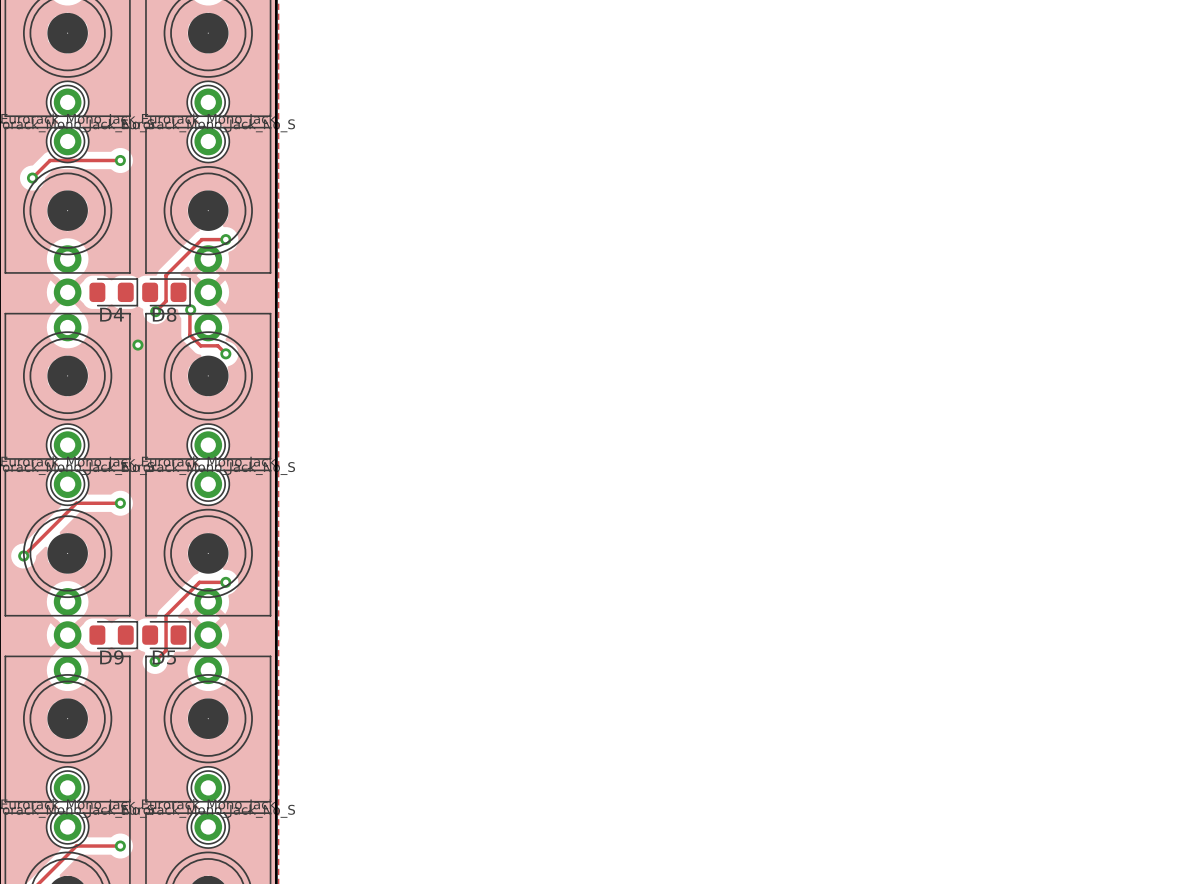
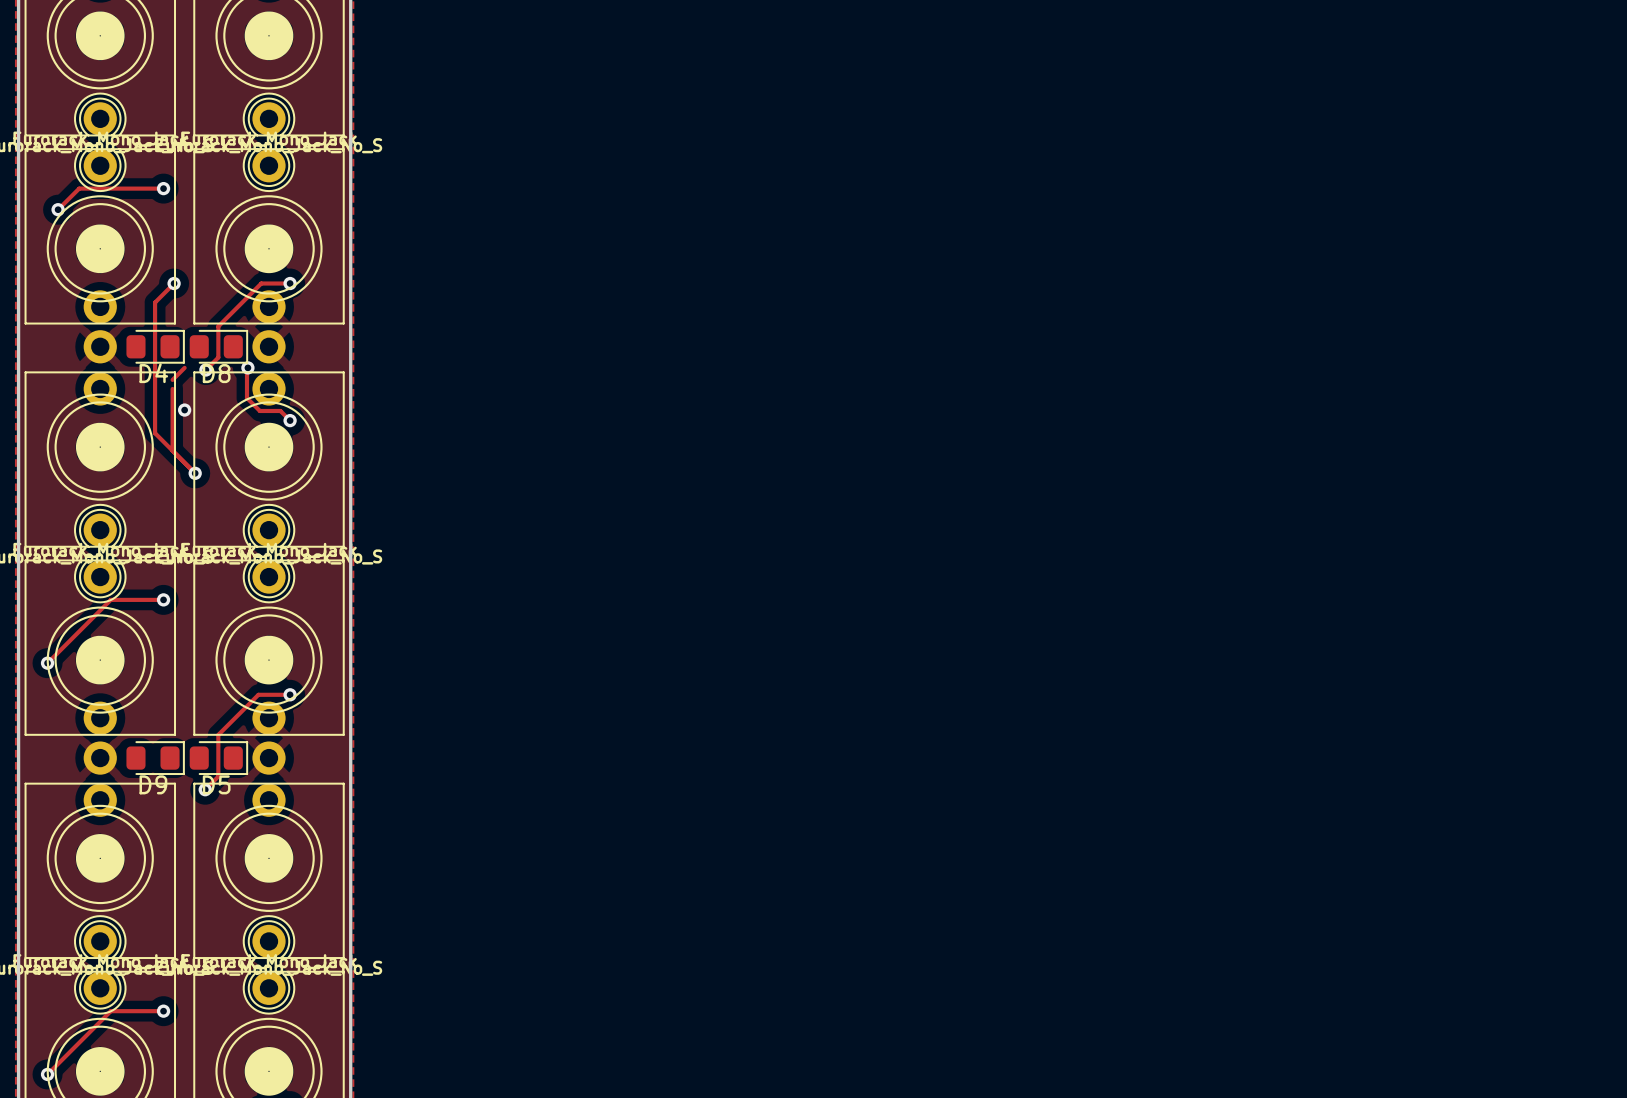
track: none -> (174, 283) (155, 302) (155, 433) (195, 473)
via: none -> (174, 283)
track: none -> (184, 367) (172, 379)
track: none -> (172, 388) (172, 450)
via: none -> (195, 473)

